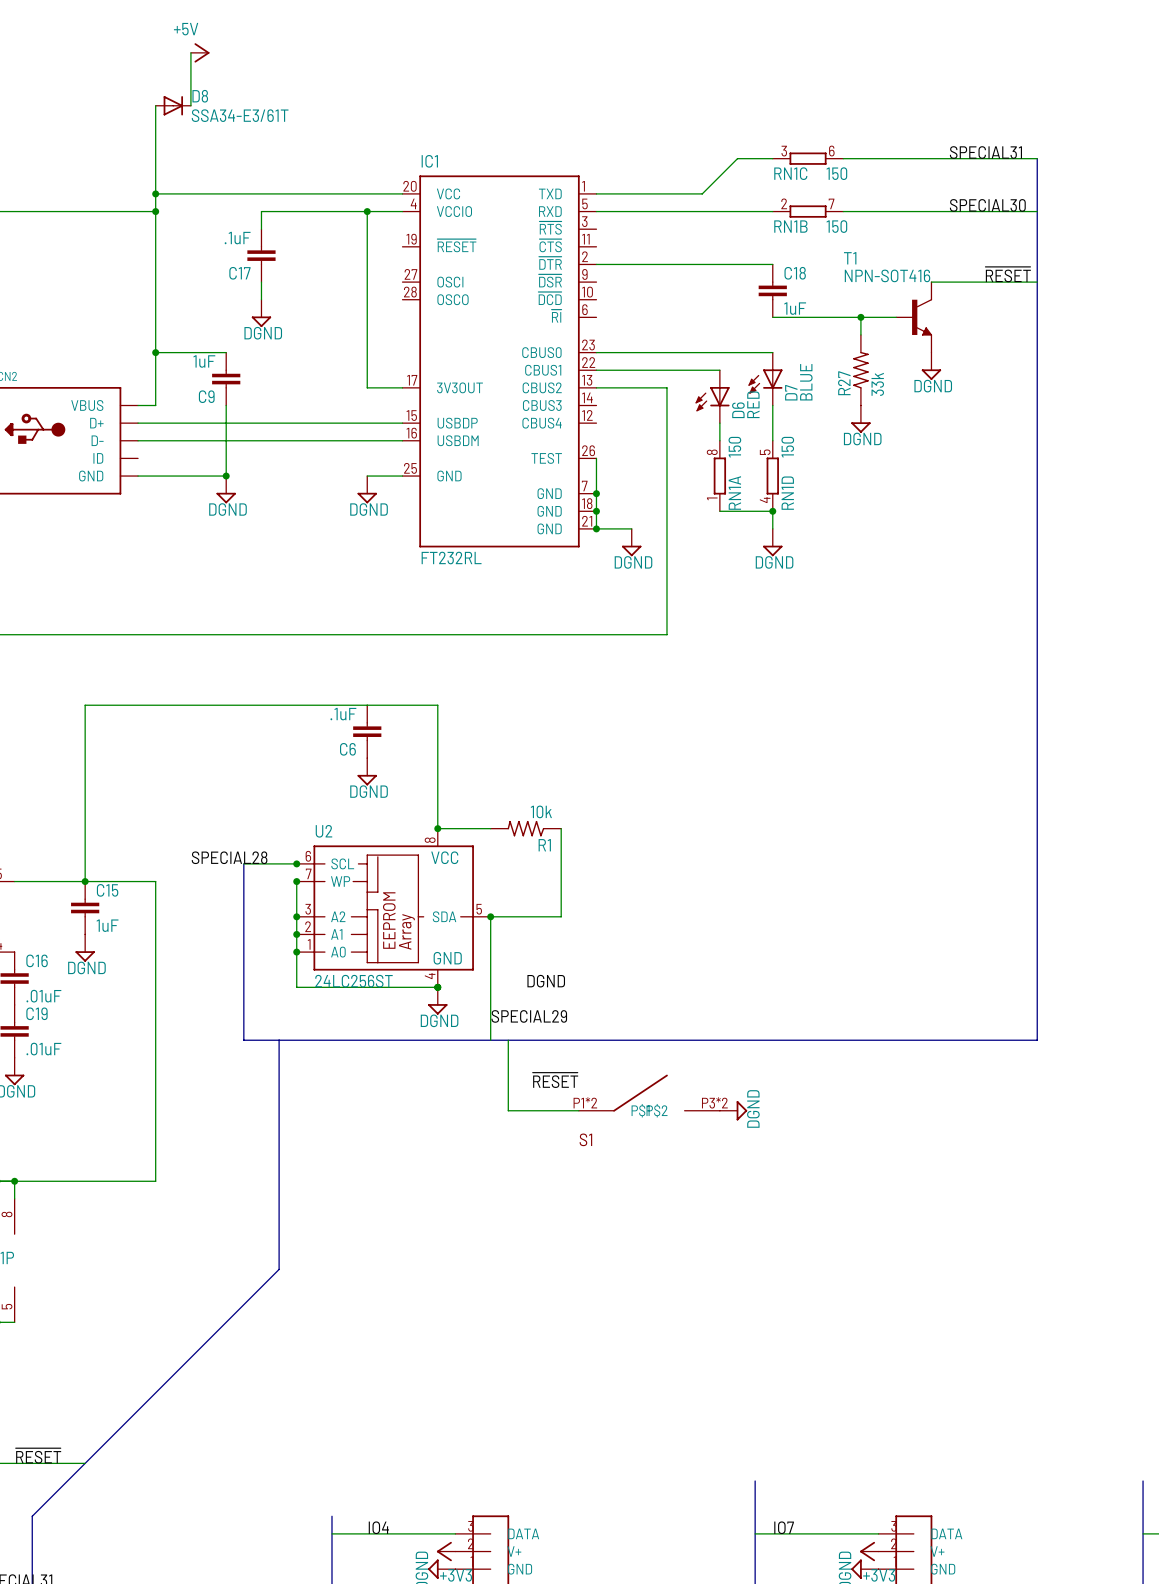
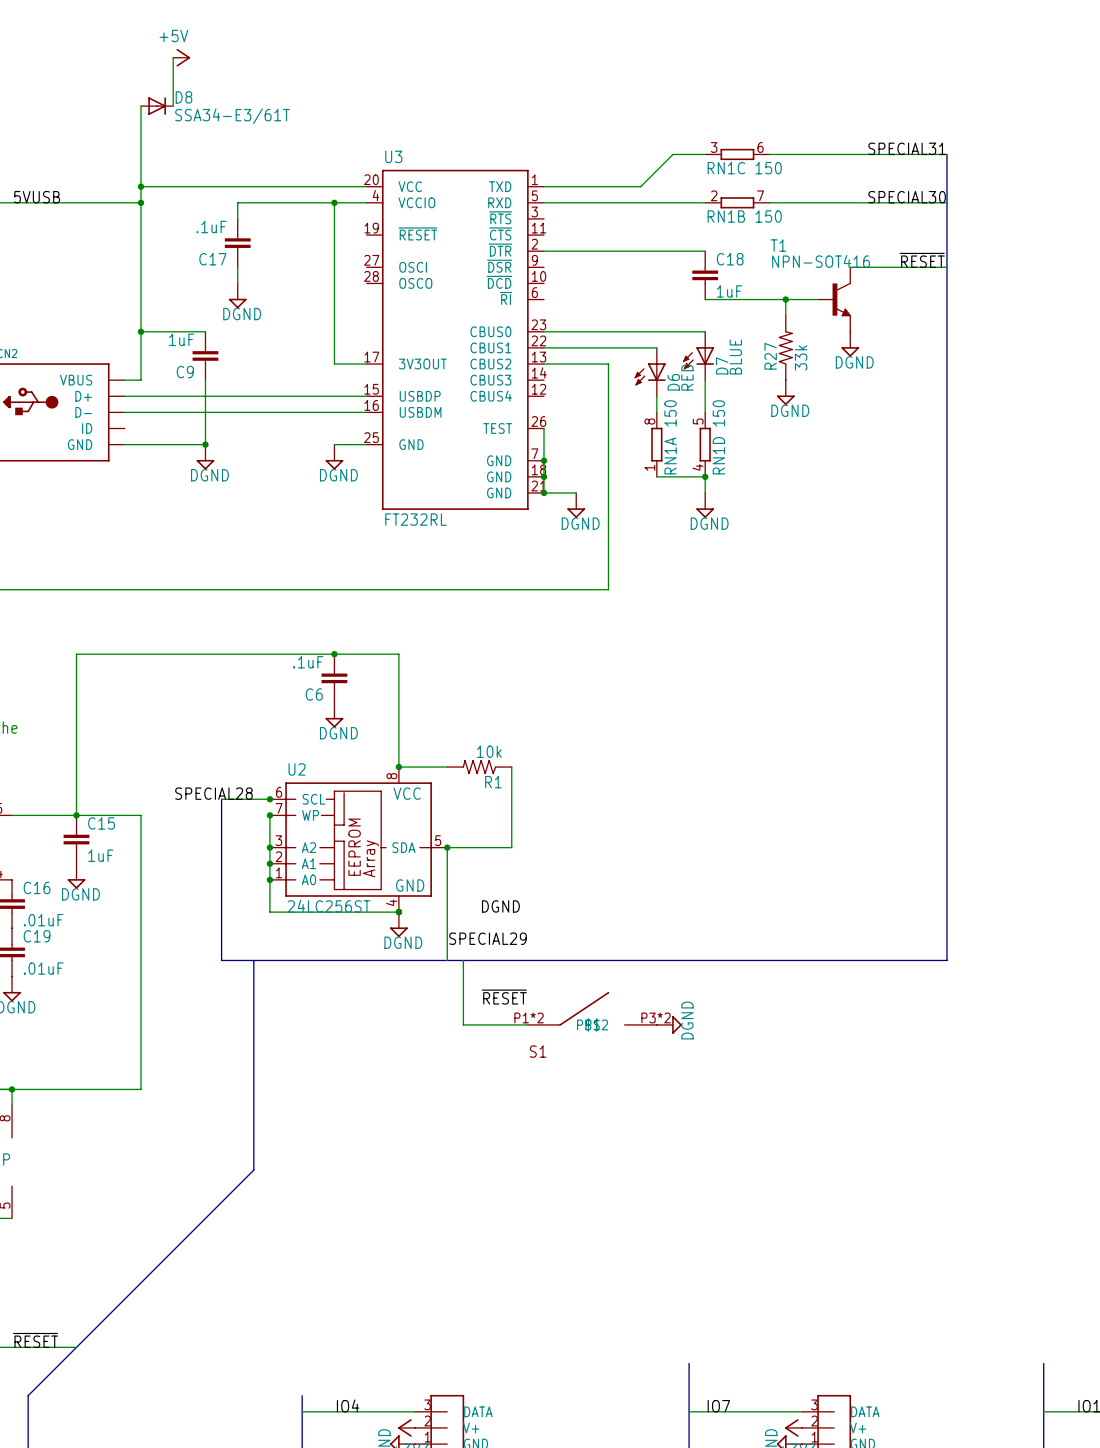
IC1 name: IC1 (429, 161) -> U3 (393, 156)
label: none -> 5VUSB (37, 197)
junction: none -> (334, 654)

